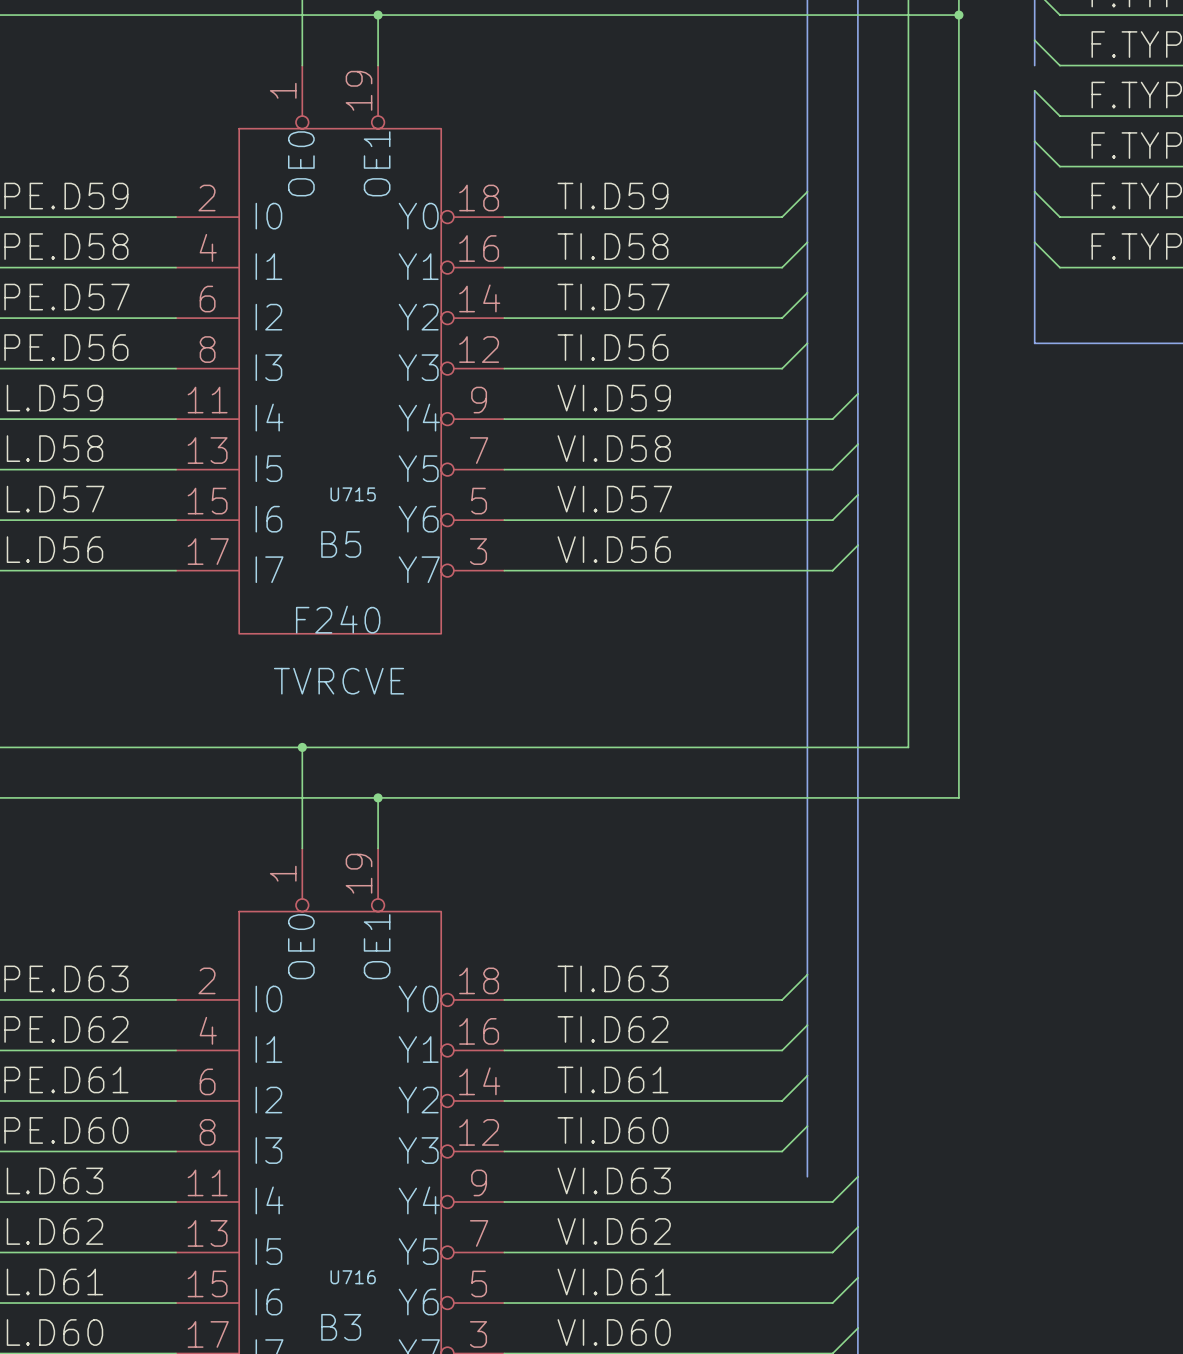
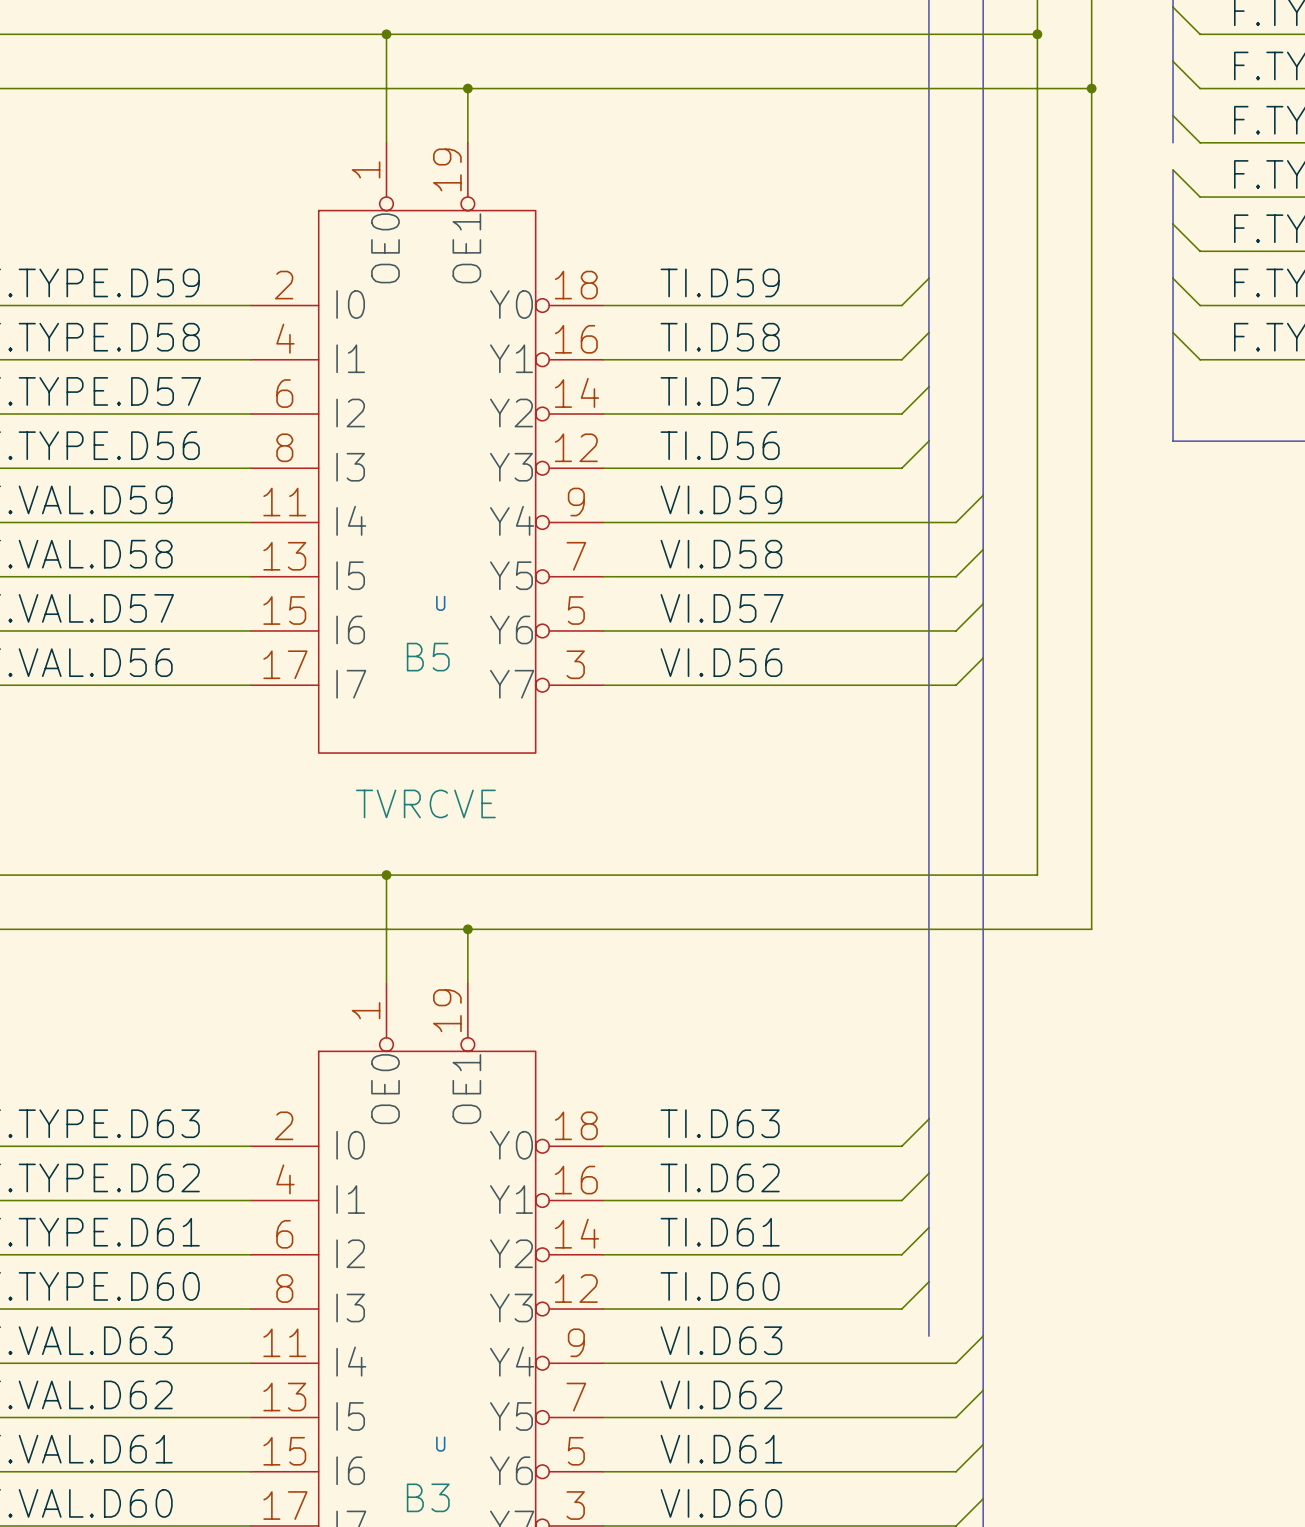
U715 name: U715 (353, 494) -> U (440, 603)
U715 value: F240 (338, 619) -> none
U716 name: U716 (353, 1277) -> U (440, 1444)

